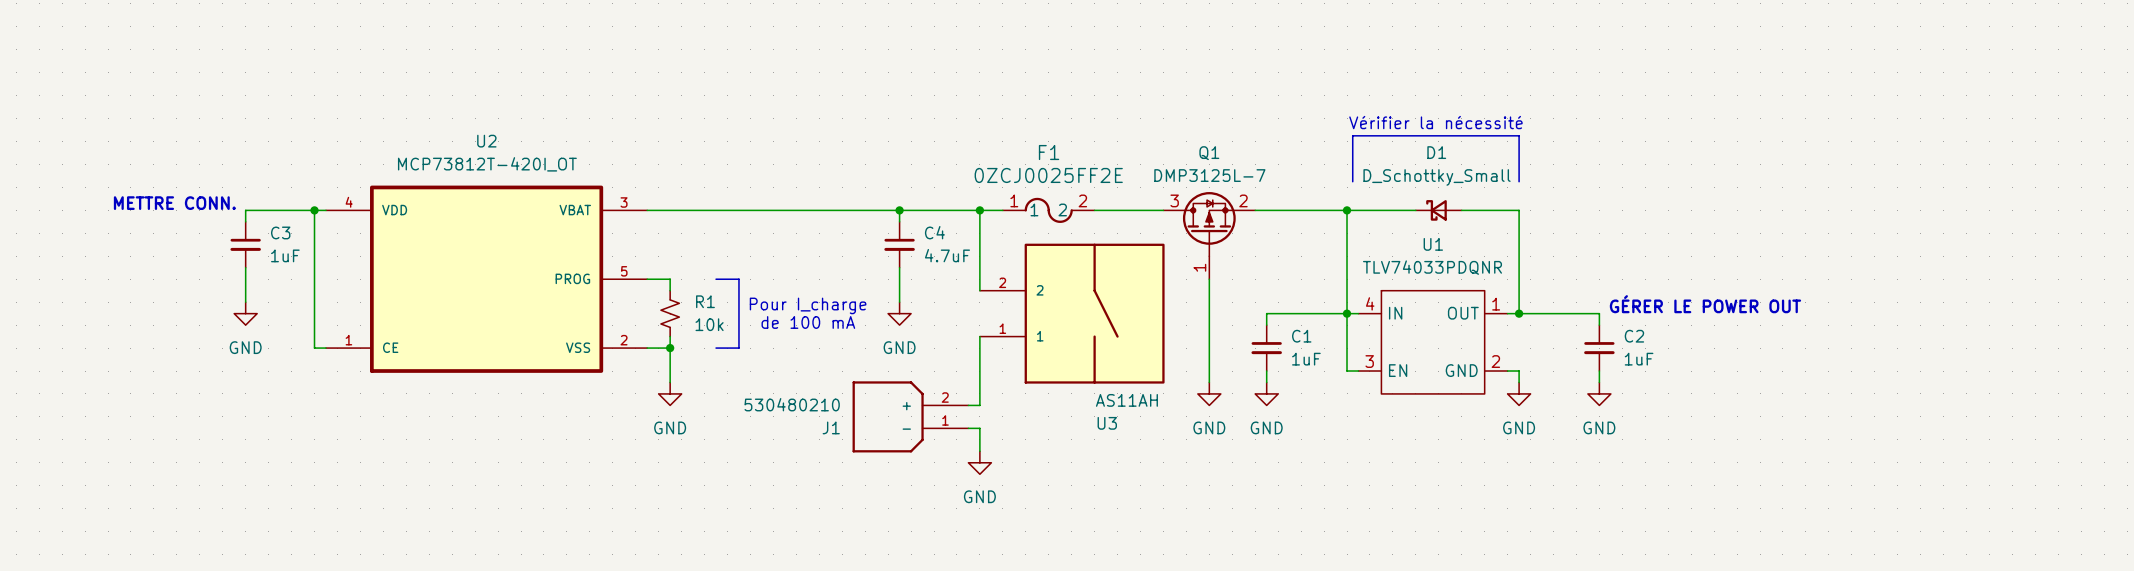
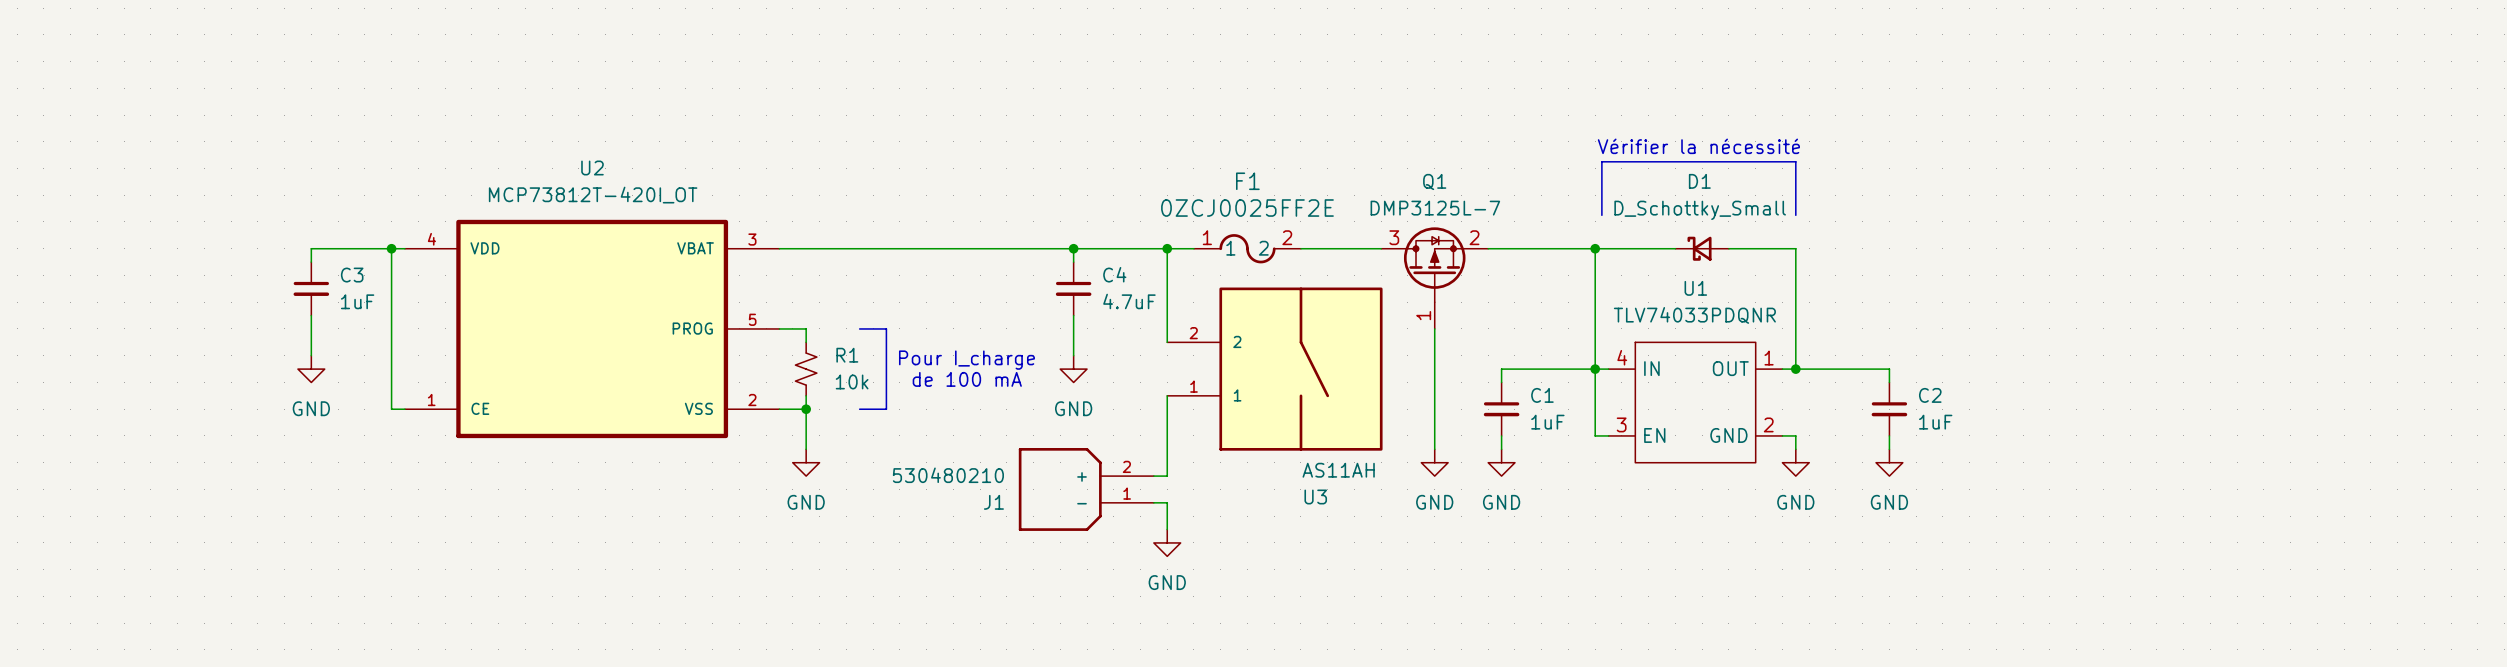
text: METTRE CONN. (174, 203) -> none
text: GÉRER LE POWER OUT (1705, 304) -> none

